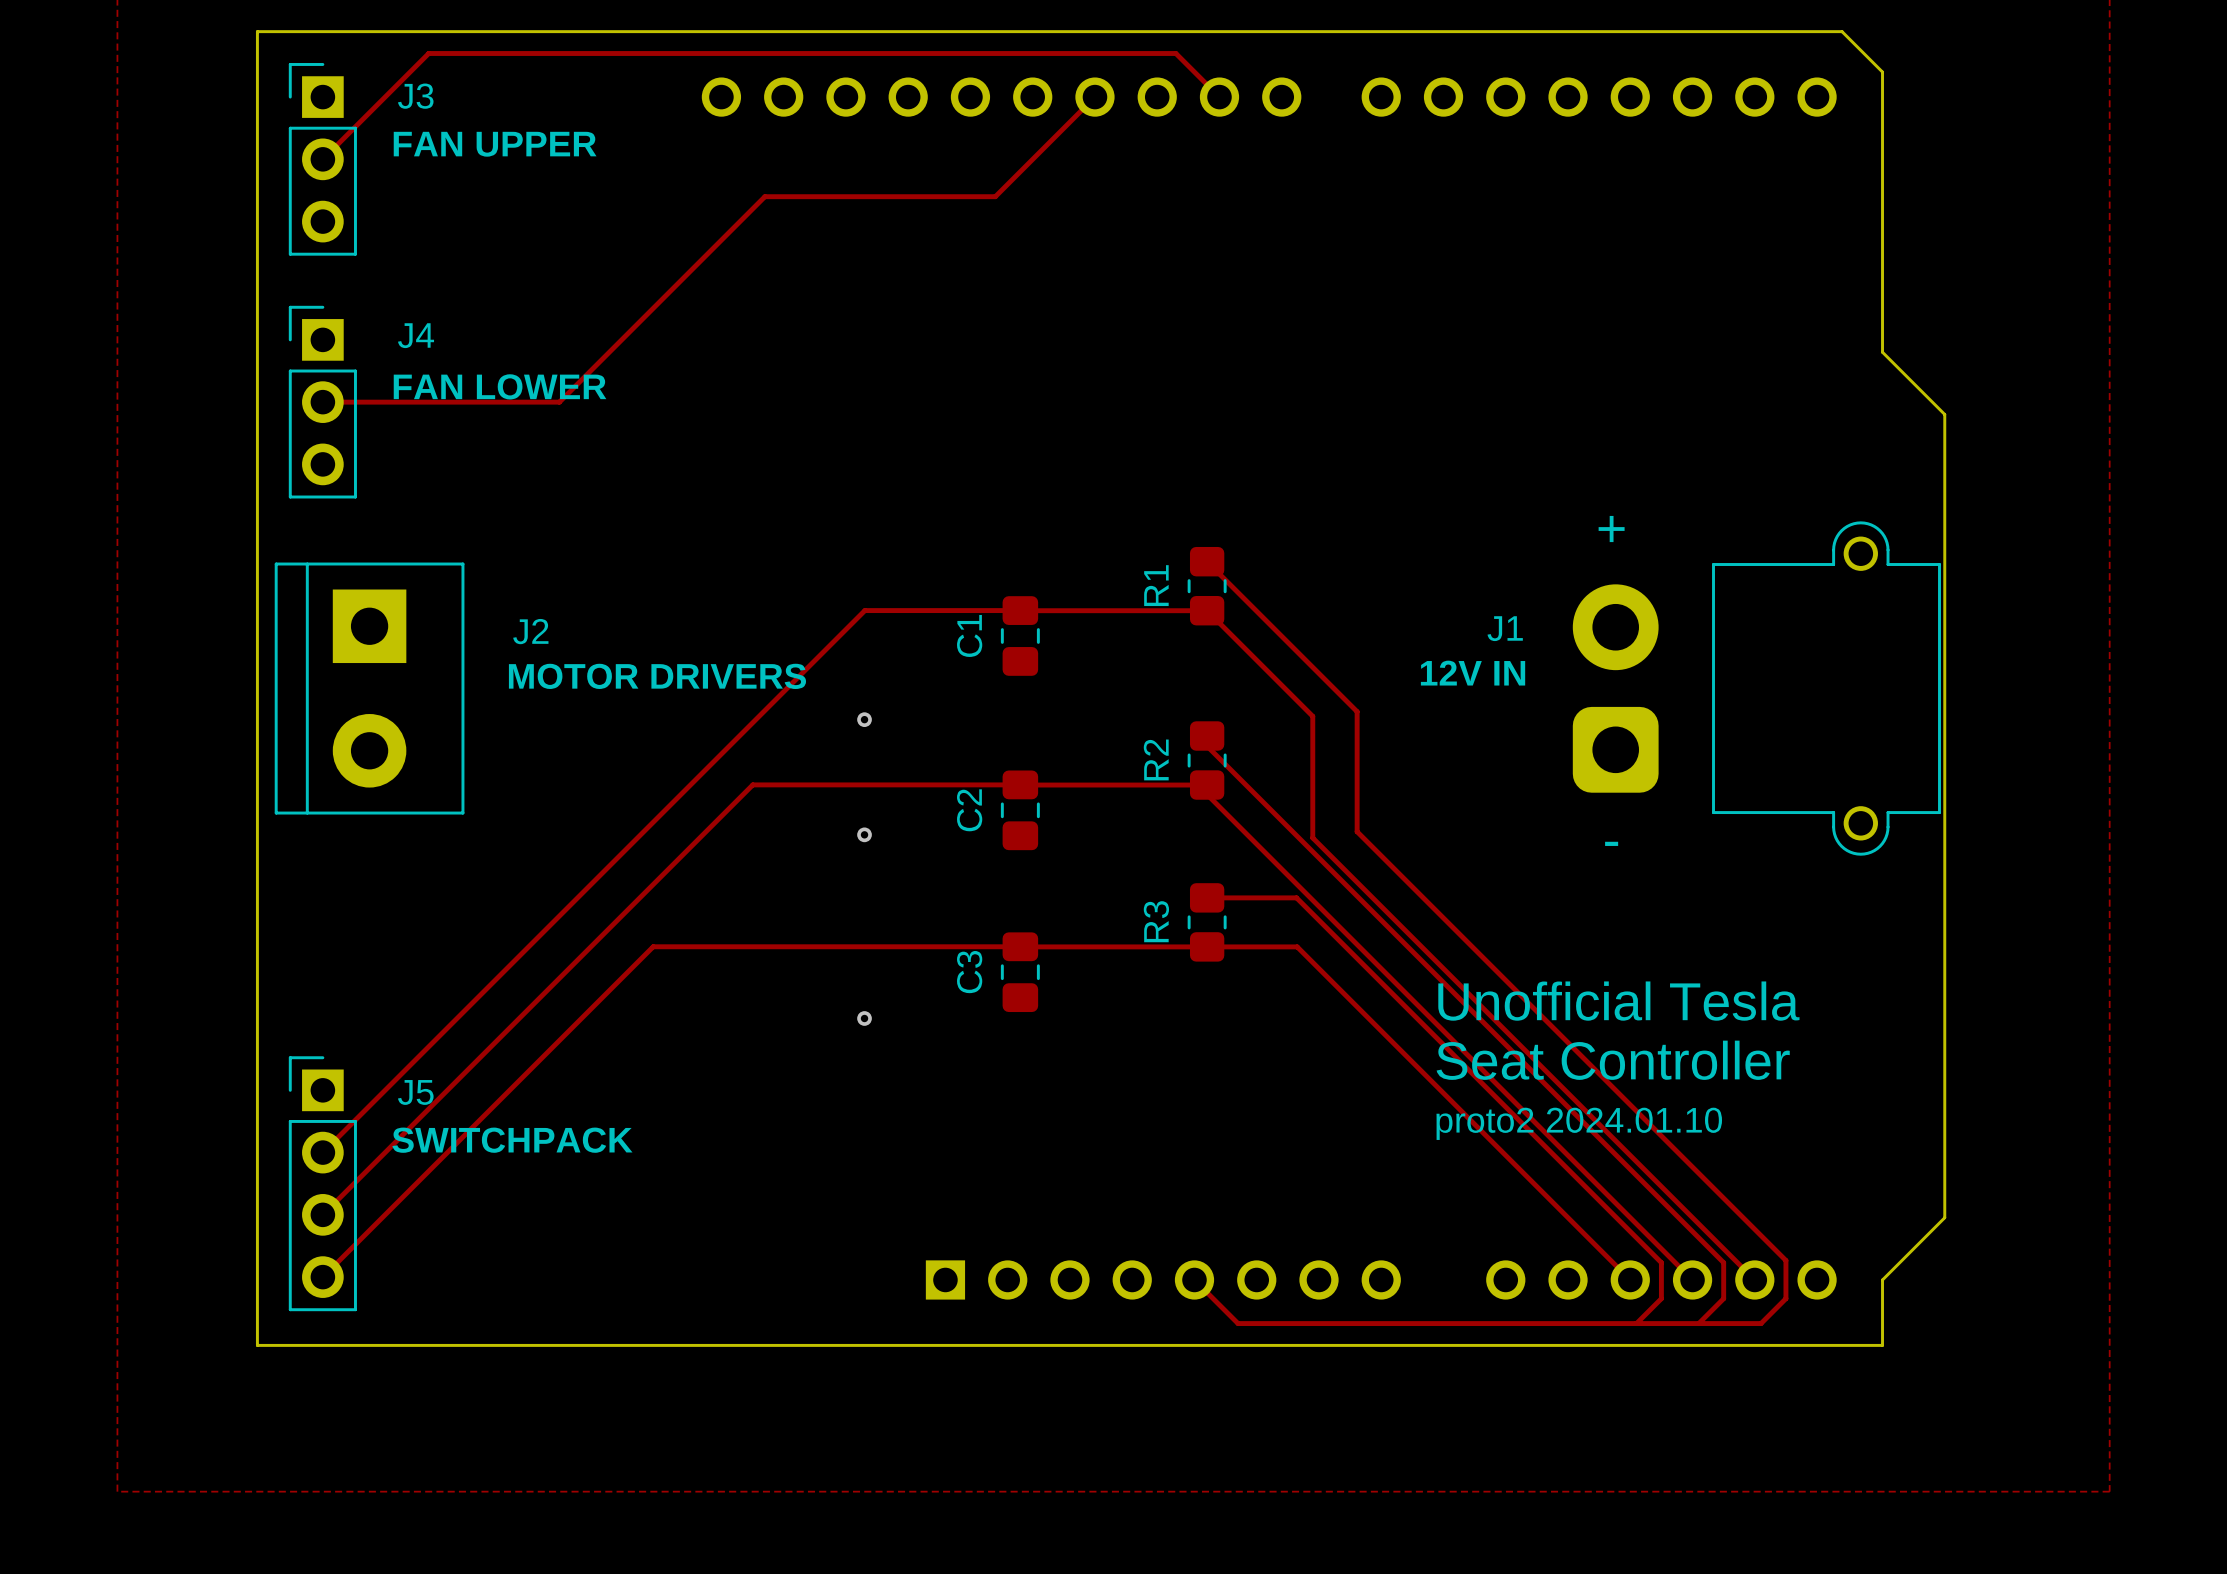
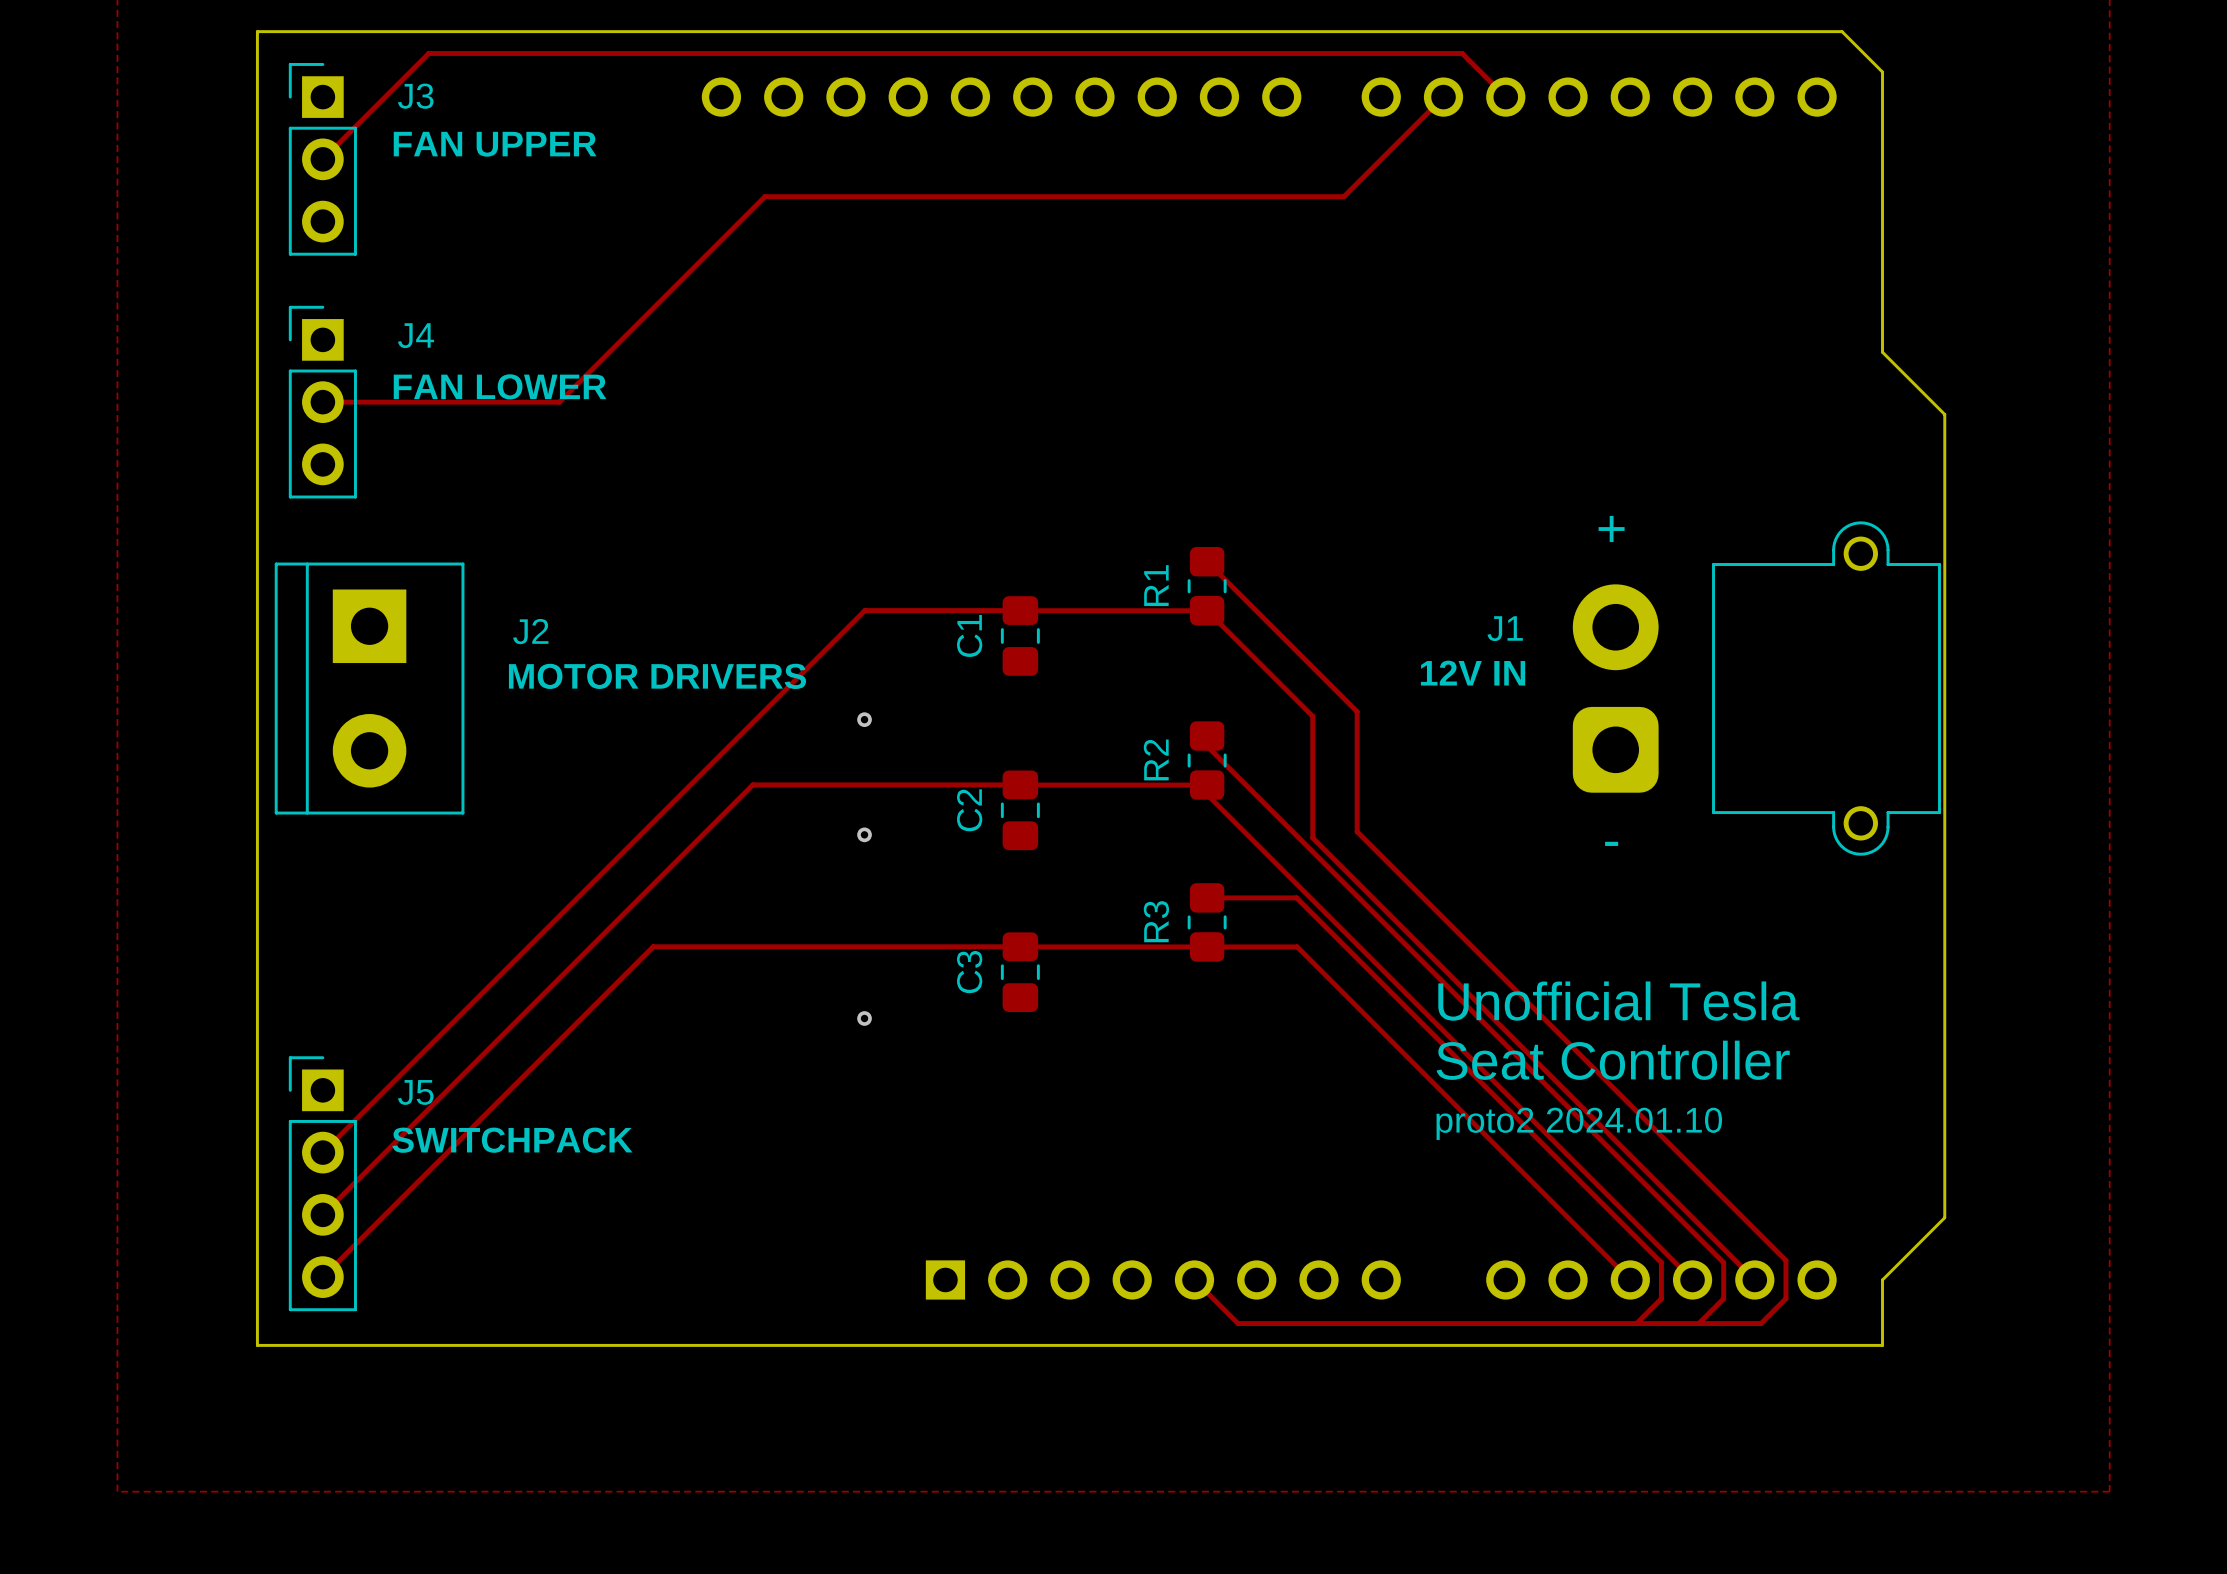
track: (1175, 53) (1219, 97) -> (1175, 53) (1462, 53) (1505, 97)
track: (1094, 97) (995, 196) -> (1443, 97) (1343, 196) (995, 196)

